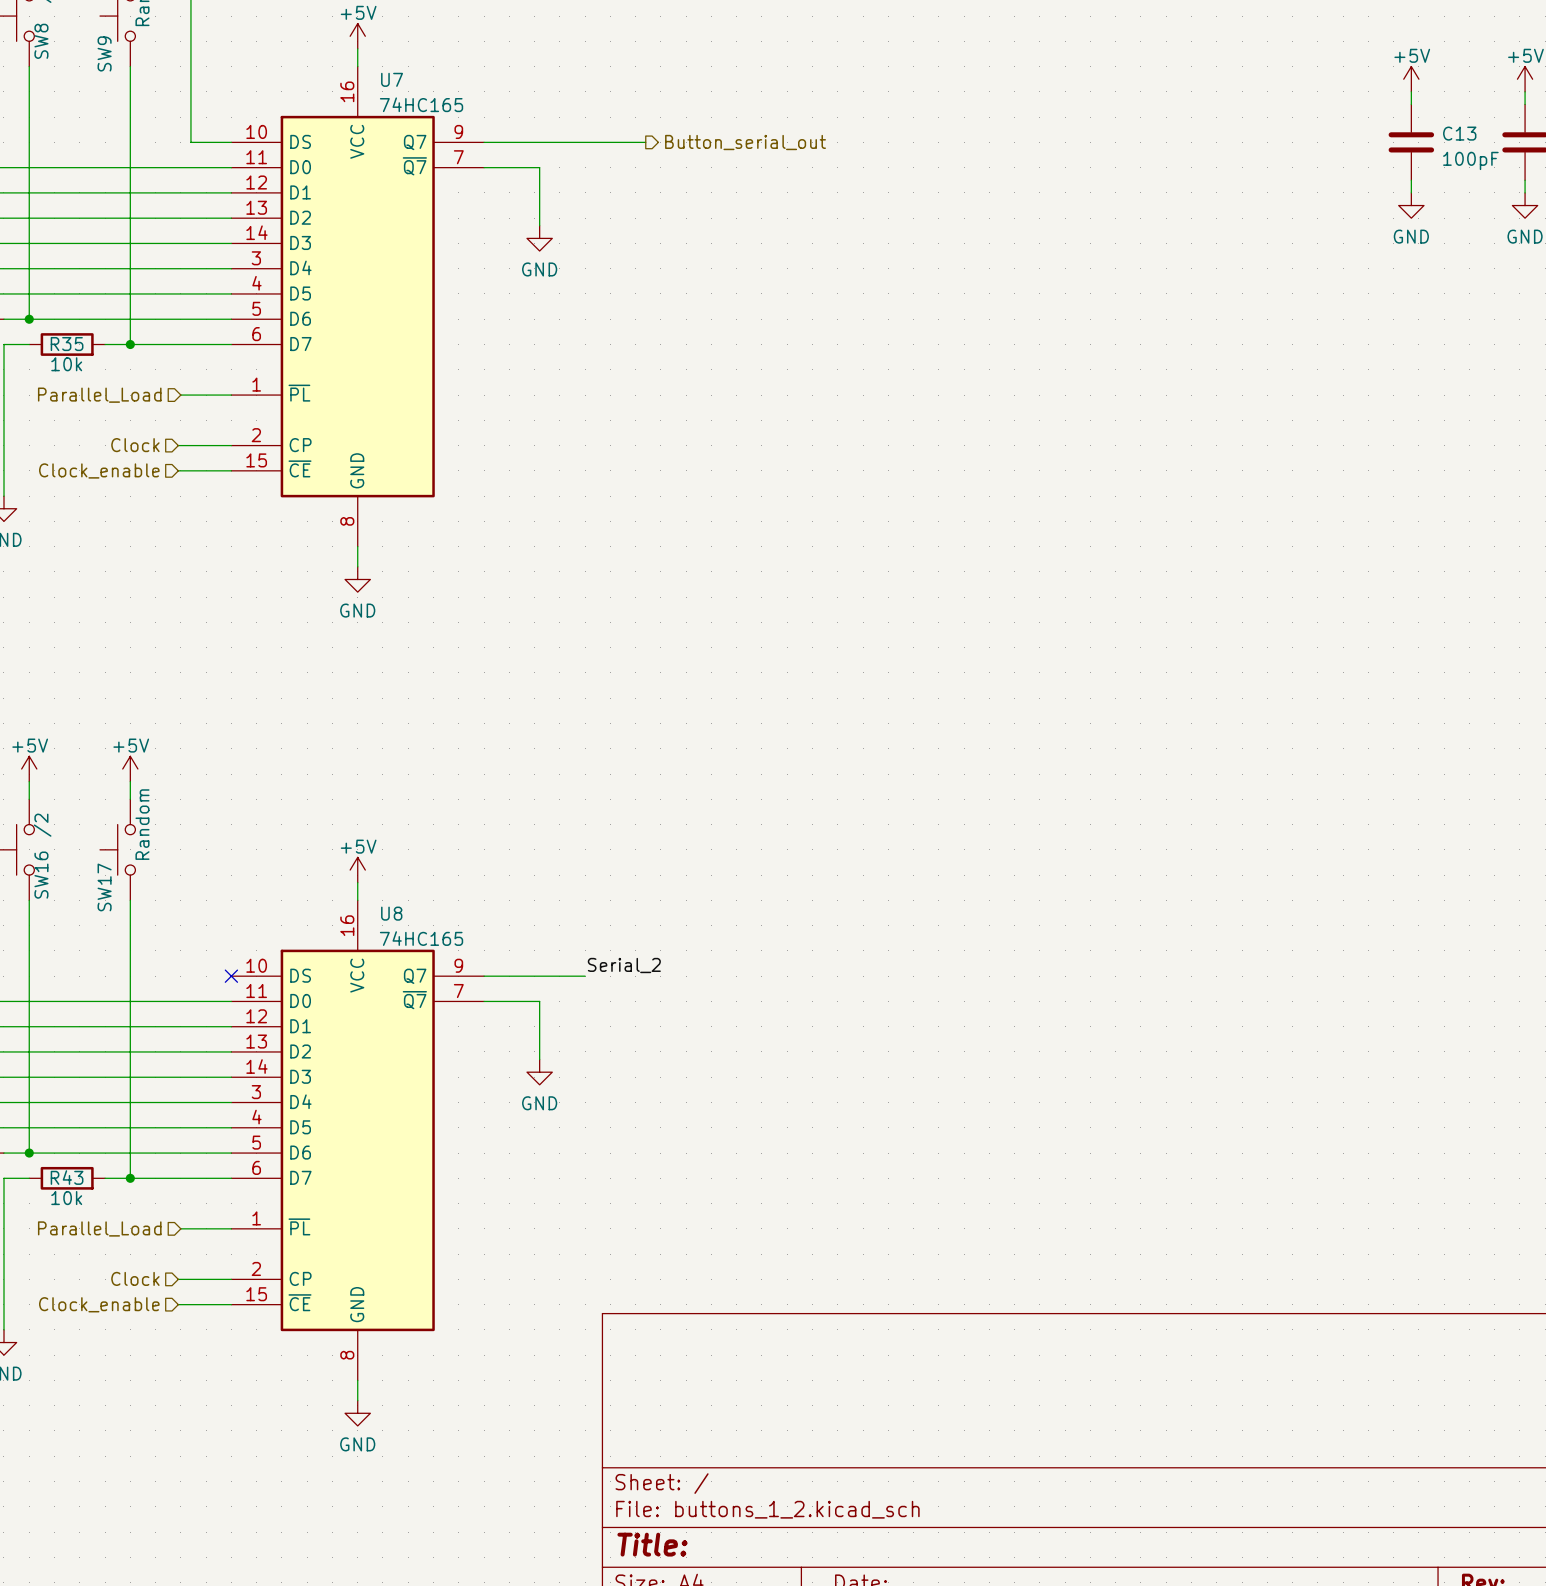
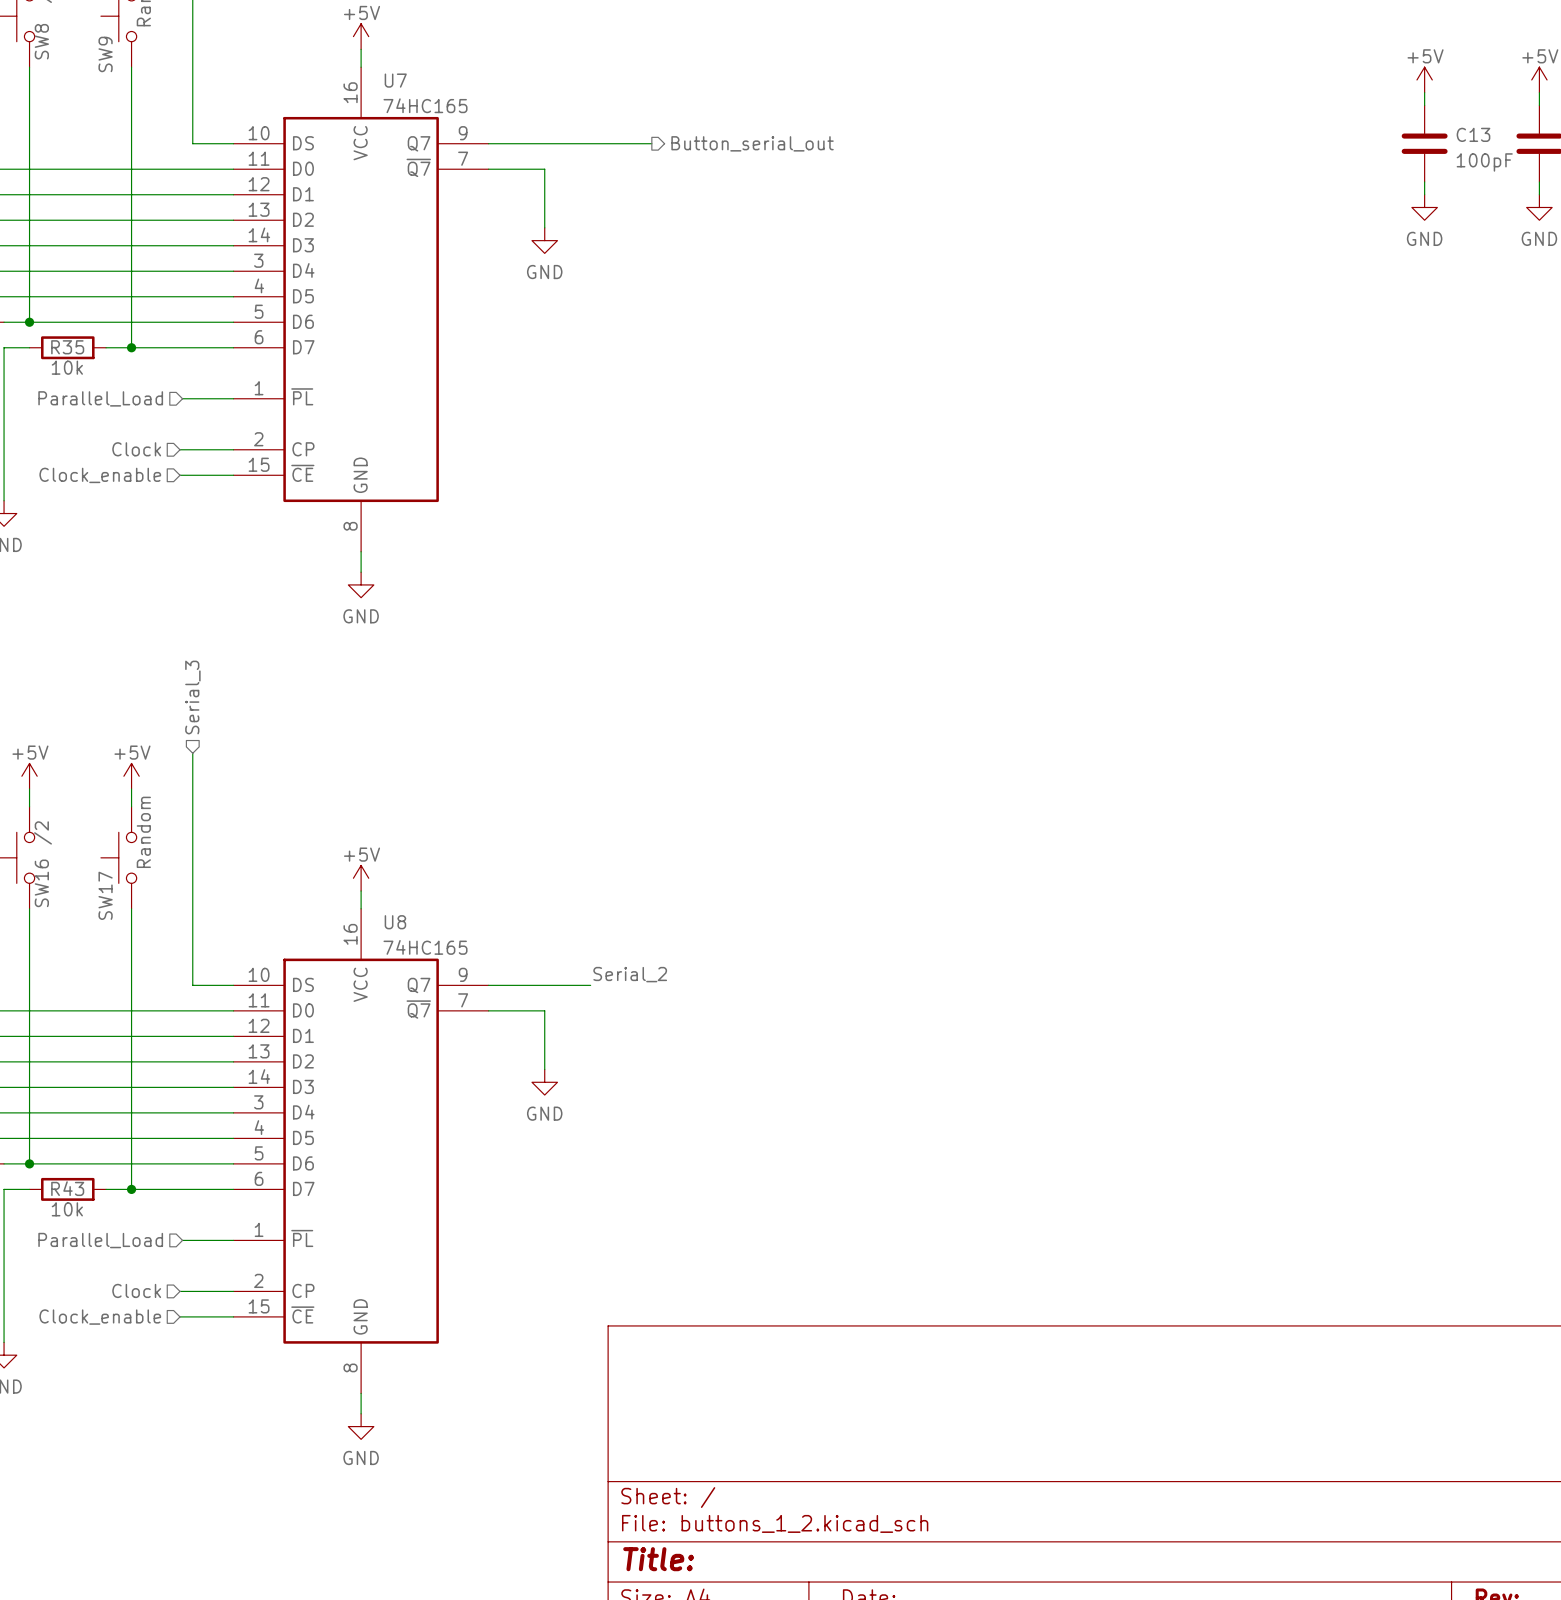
hierarchical label: none -> Serial_3 (192, 697)
wire: none -> (192, 753) (192, 985) (233, 985)
no-connect mark: (231, 976) -> none

